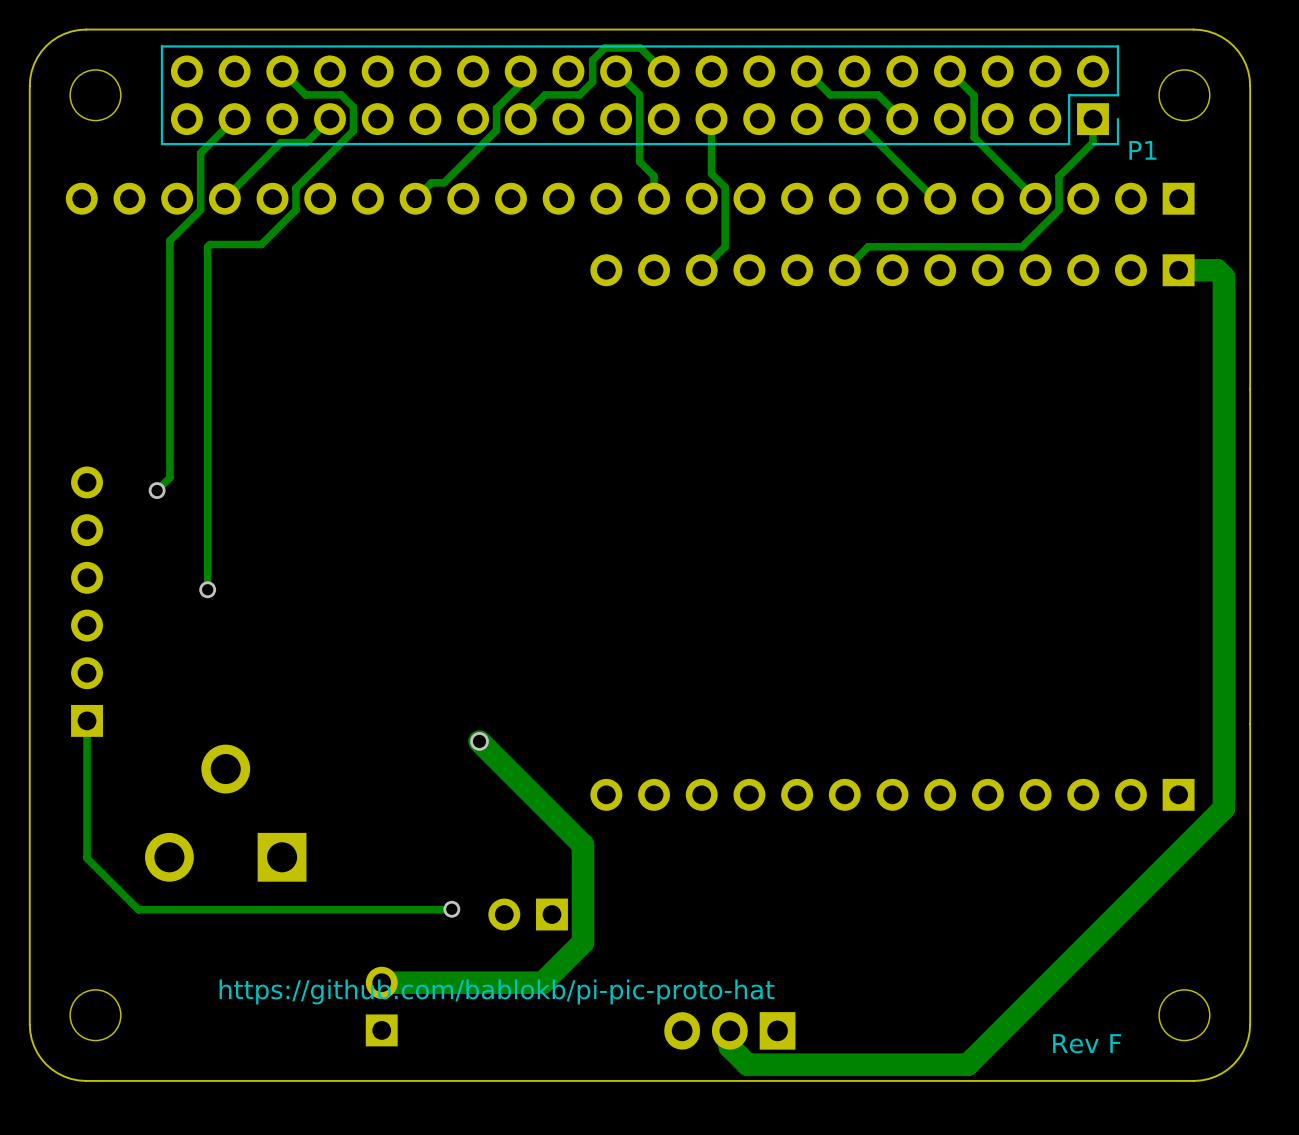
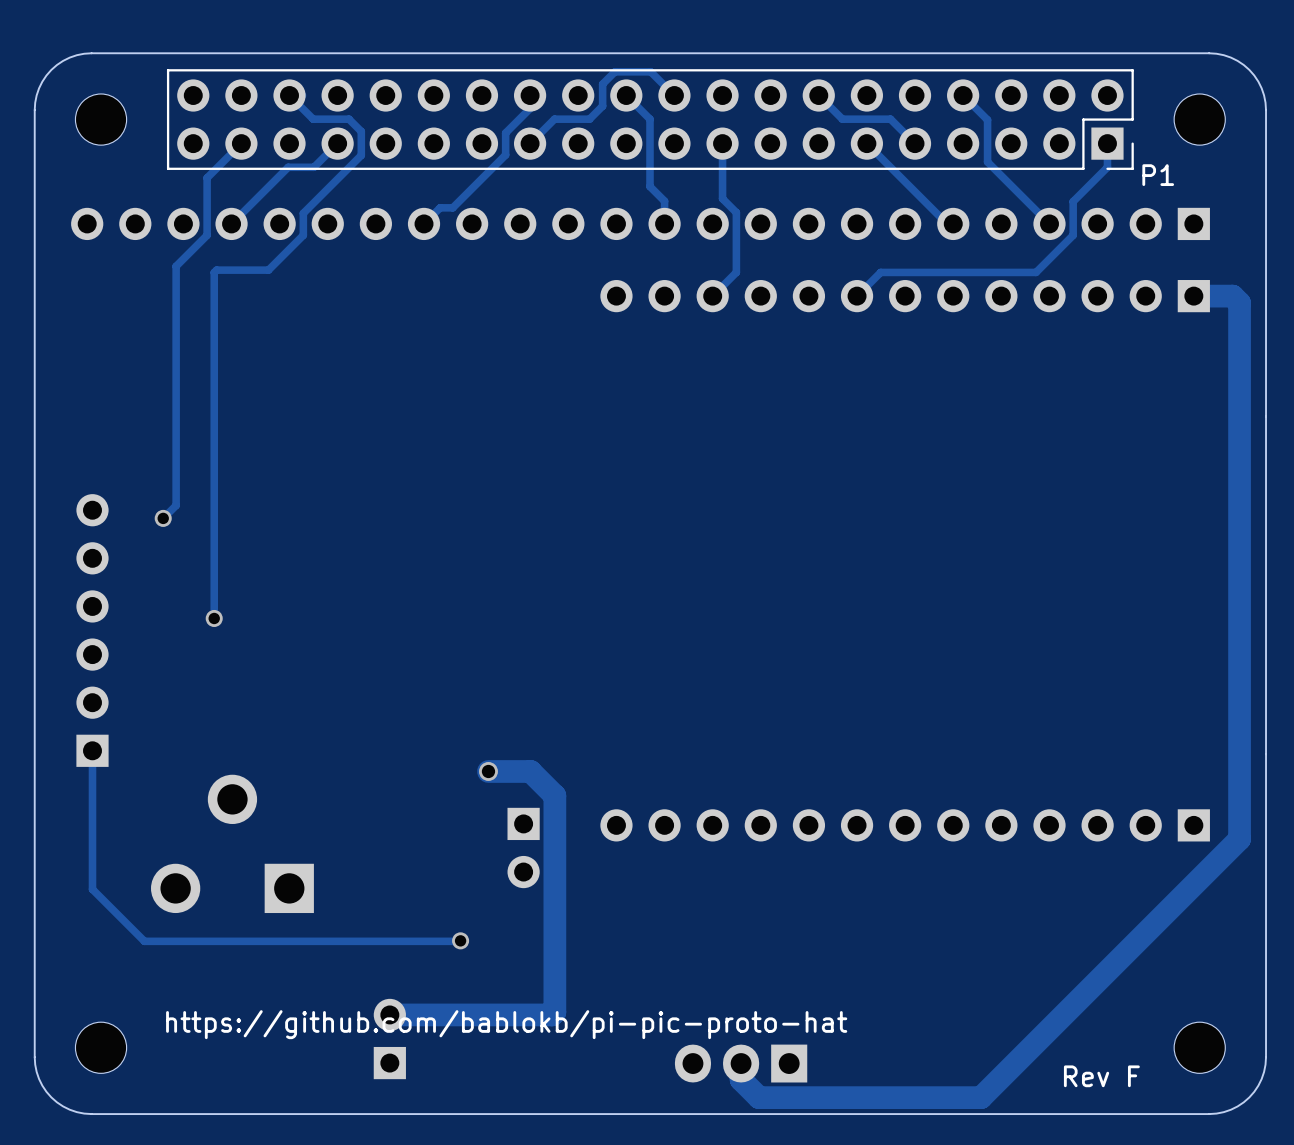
track: (479, 741) (582, 844) (582, 942) (545, 980) -> (488, 771) (530, 771) (554, 795) (554, 1012)
part rotation: 0° (528, 914) -> 90° counterclockwise (523, 847)
part position: (528, 914) -> (523, 847)

